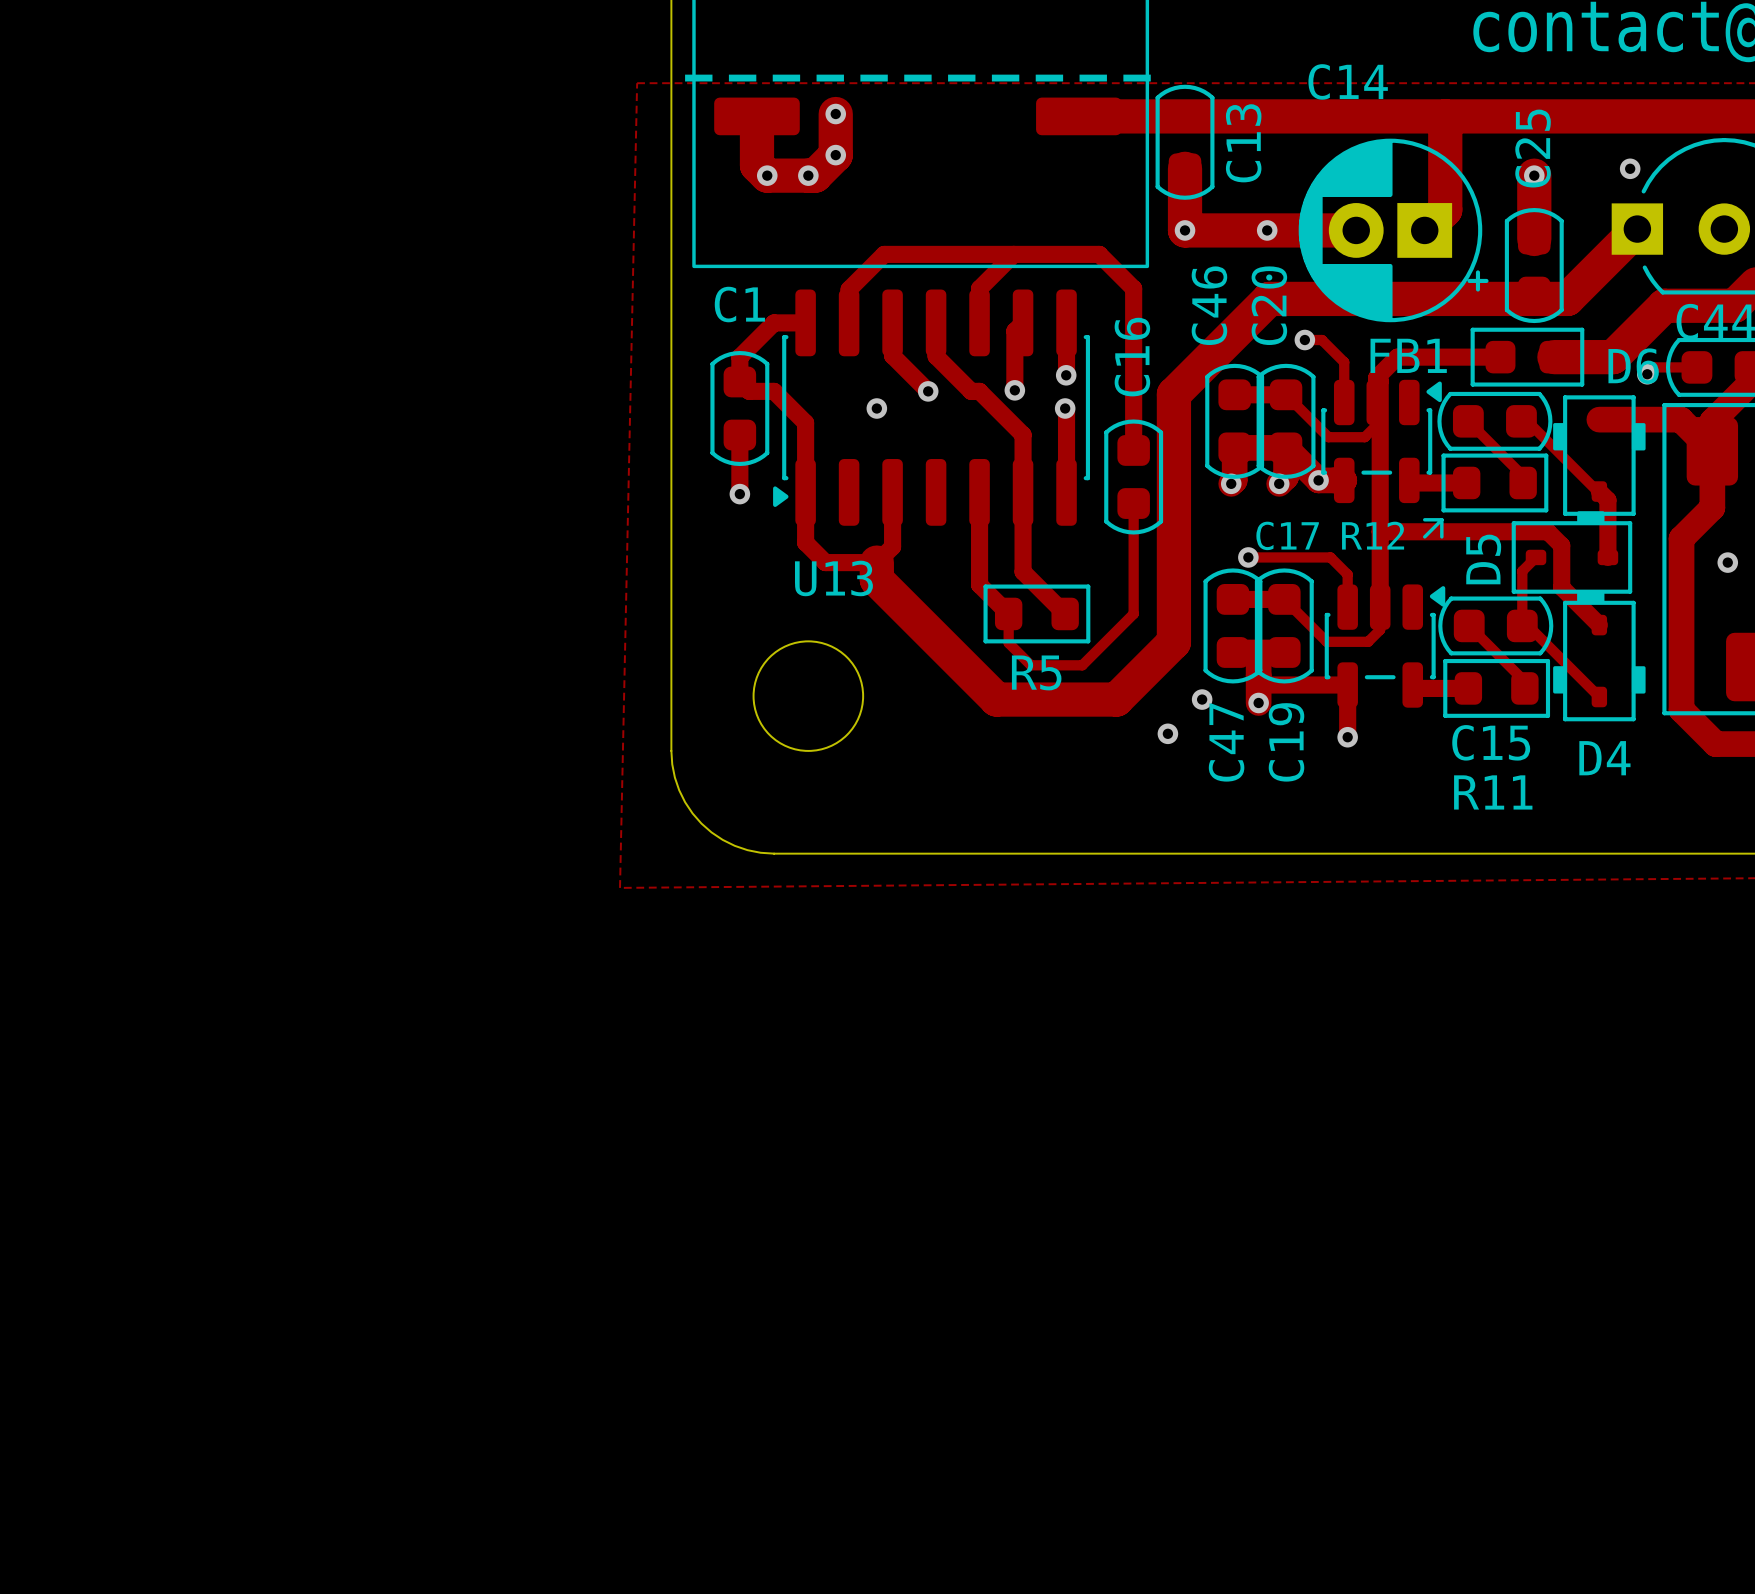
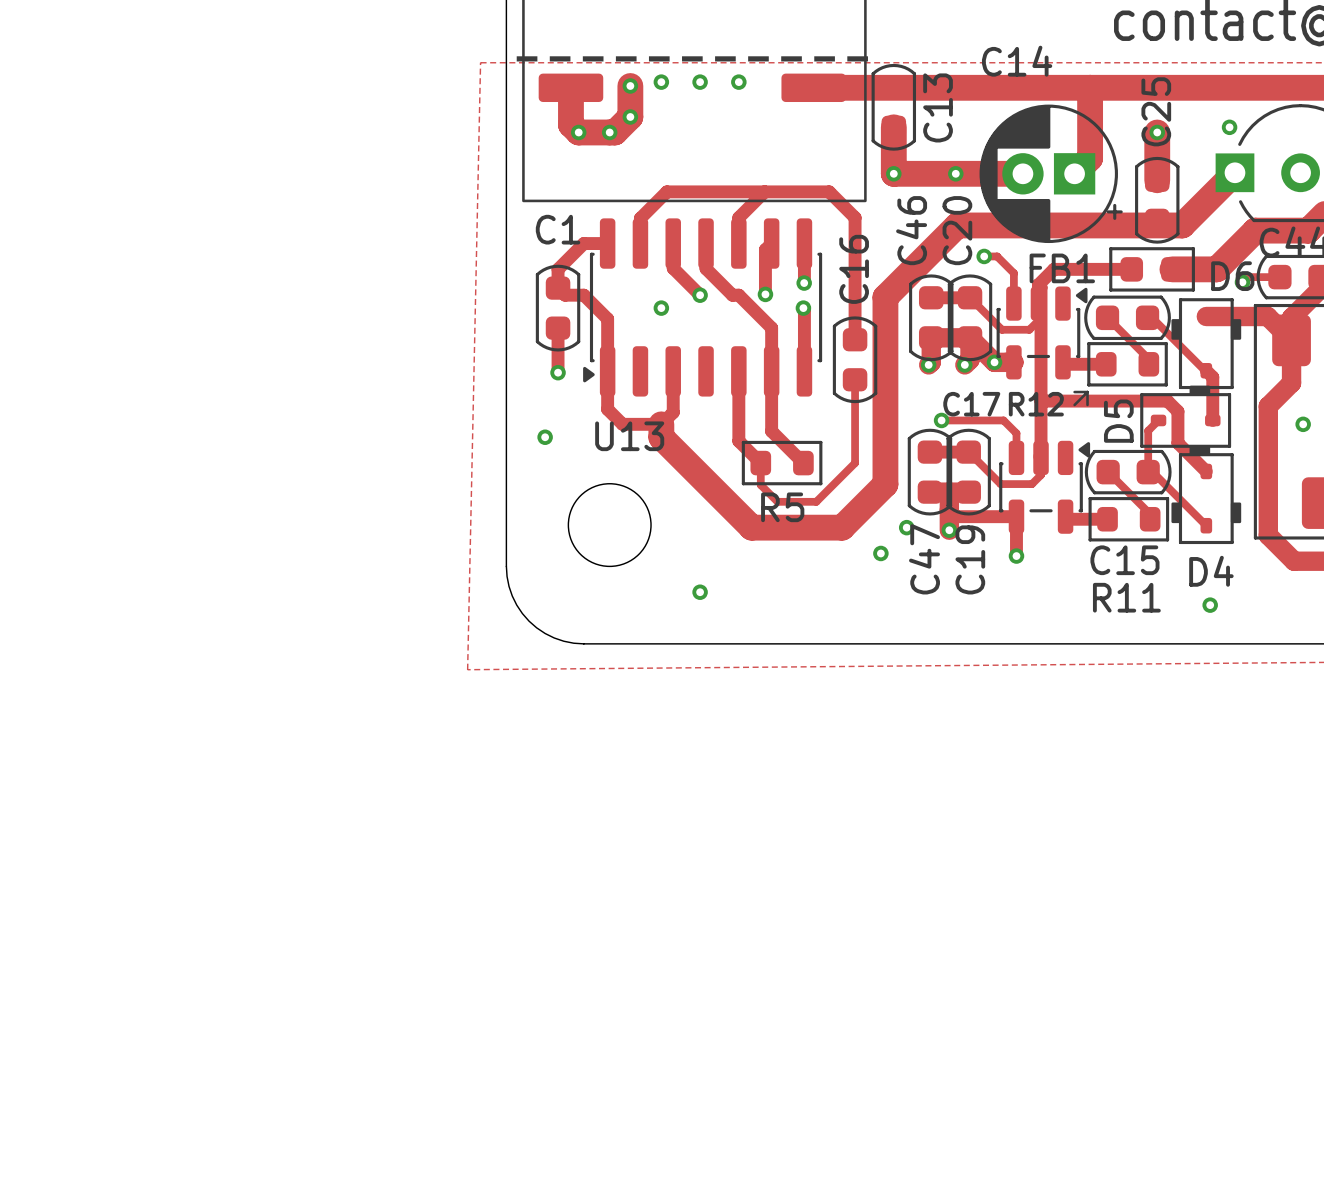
via: none -> (661, 82)
via: none -> (700, 82)
via: none -> (738, 82)
via: none -> (545, 437)
via: none -> (700, 592)
via: none -> (1210, 605)

